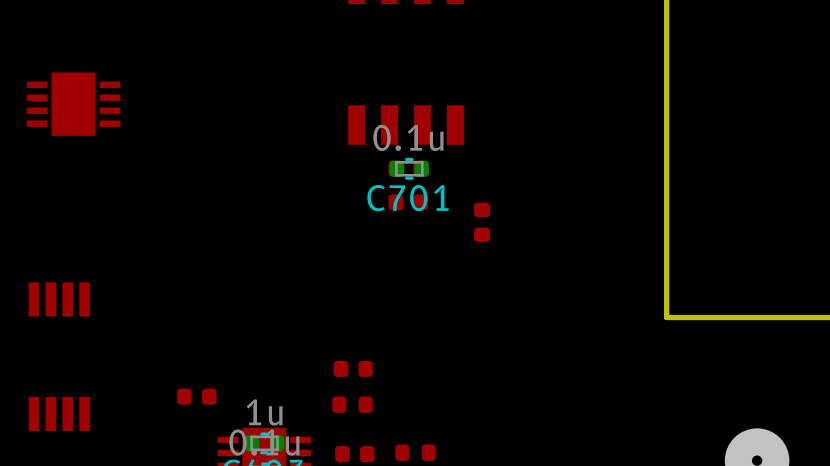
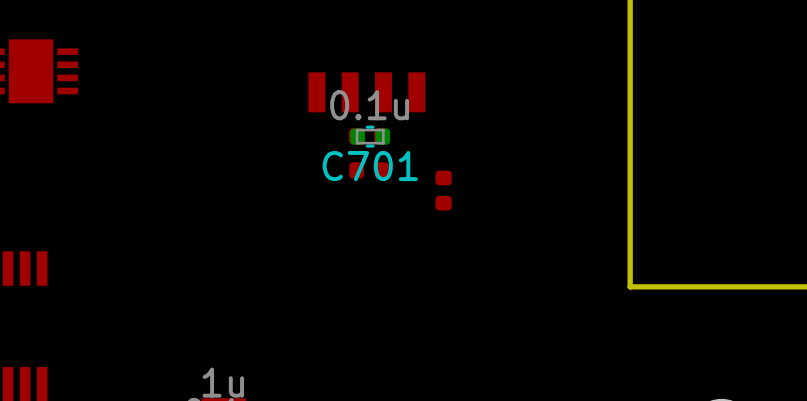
part: (353, 368) -> none
part: (196, 396) -> none
part: (352, 404) -> none

